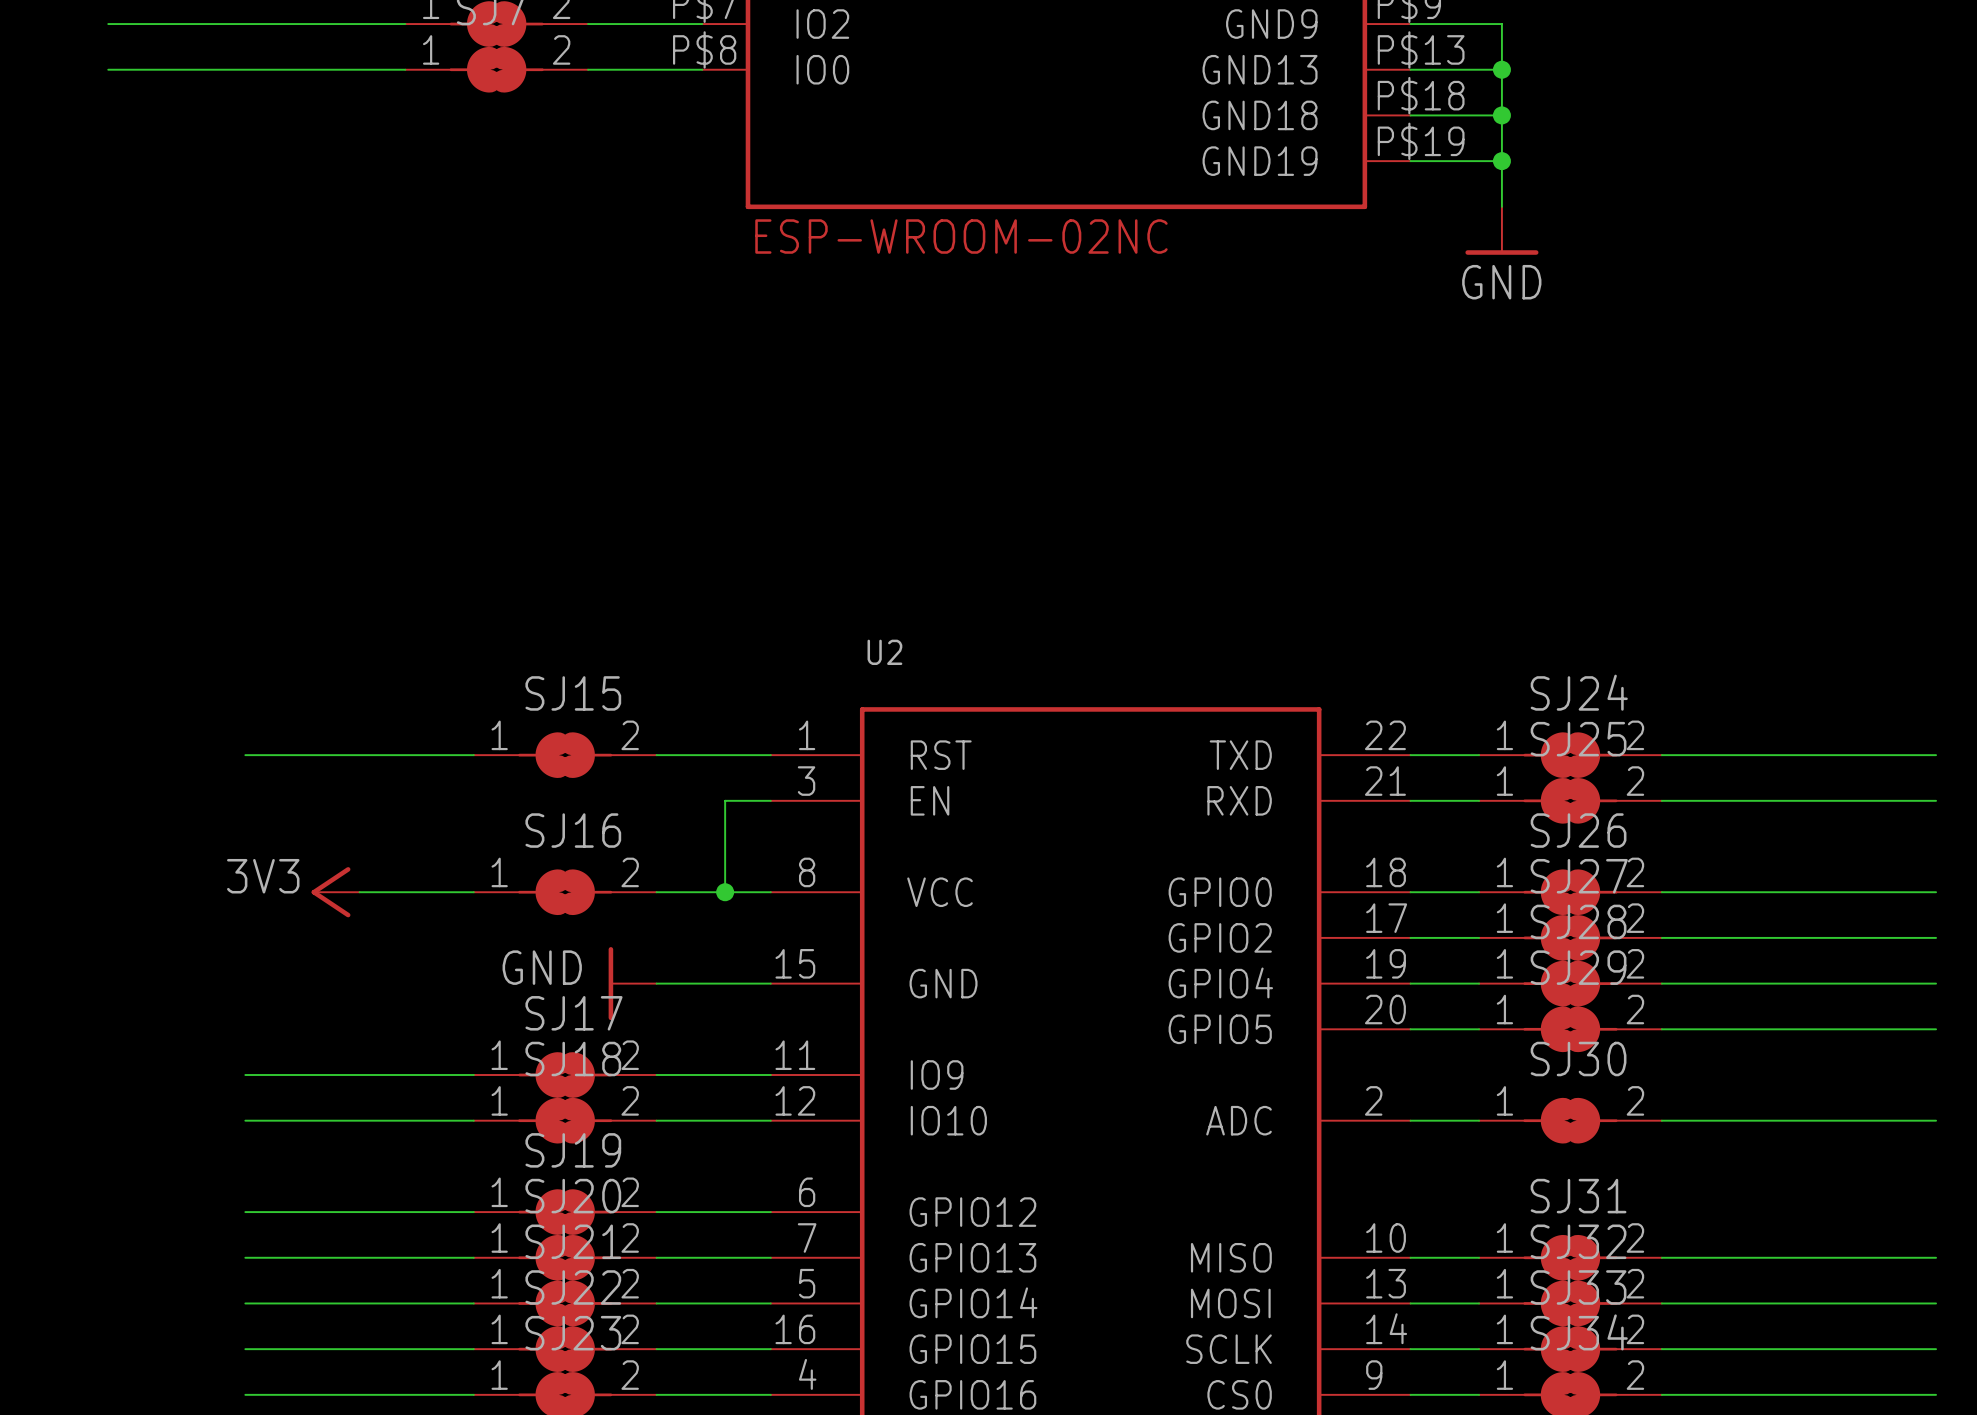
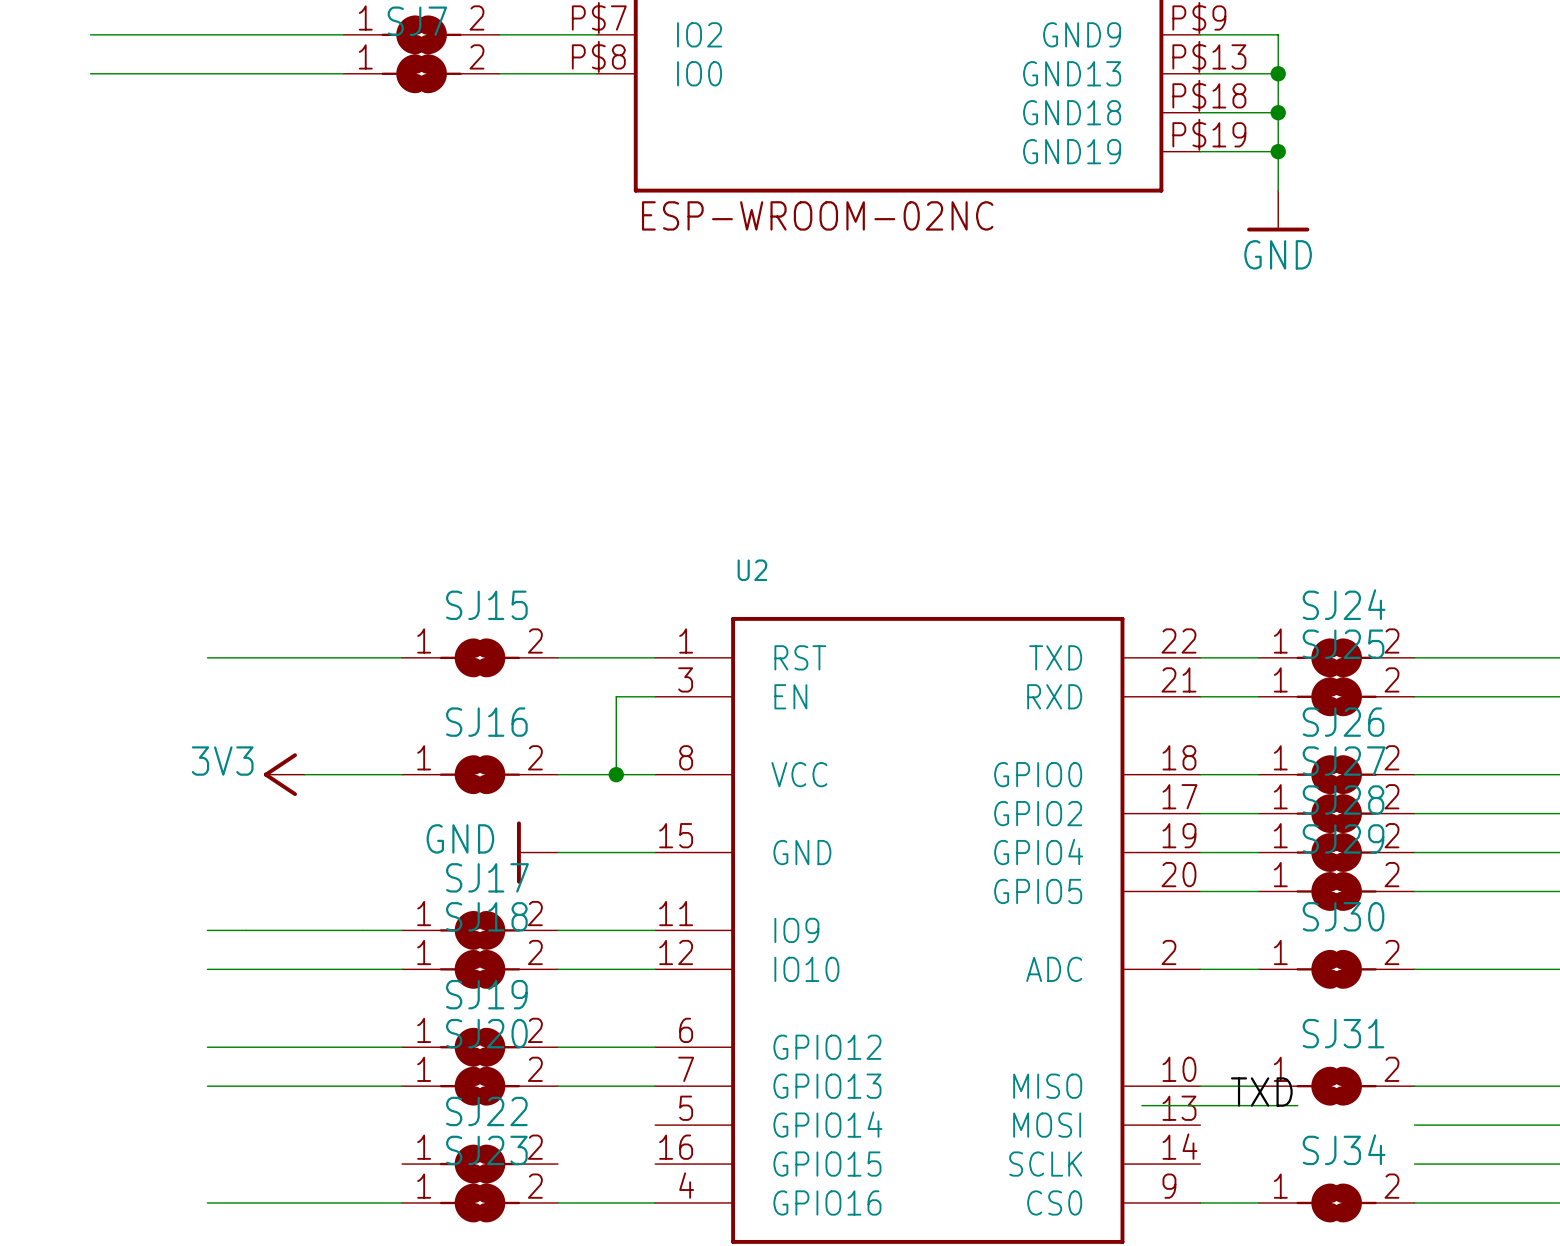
label: none -> TXD (1261, 1092)
wire: none -> (1141, 1105) (1297, 1105)
wire: (245, 1303) (473, 1303) -> none
SJ21: (565, 1303) -> none
wire: (656, 1303) (770, 1303) -> none
wire: (1410, 1303) (1479, 1303) -> none
SJ32: (1570, 1303) -> none
wire: (245, 1349) (473, 1349) -> none
wire: (656, 1349) (770, 1349) -> none
wire: (1410, 1349) (1479, 1349) -> none
SJ33: (1570, 1349) -> none

